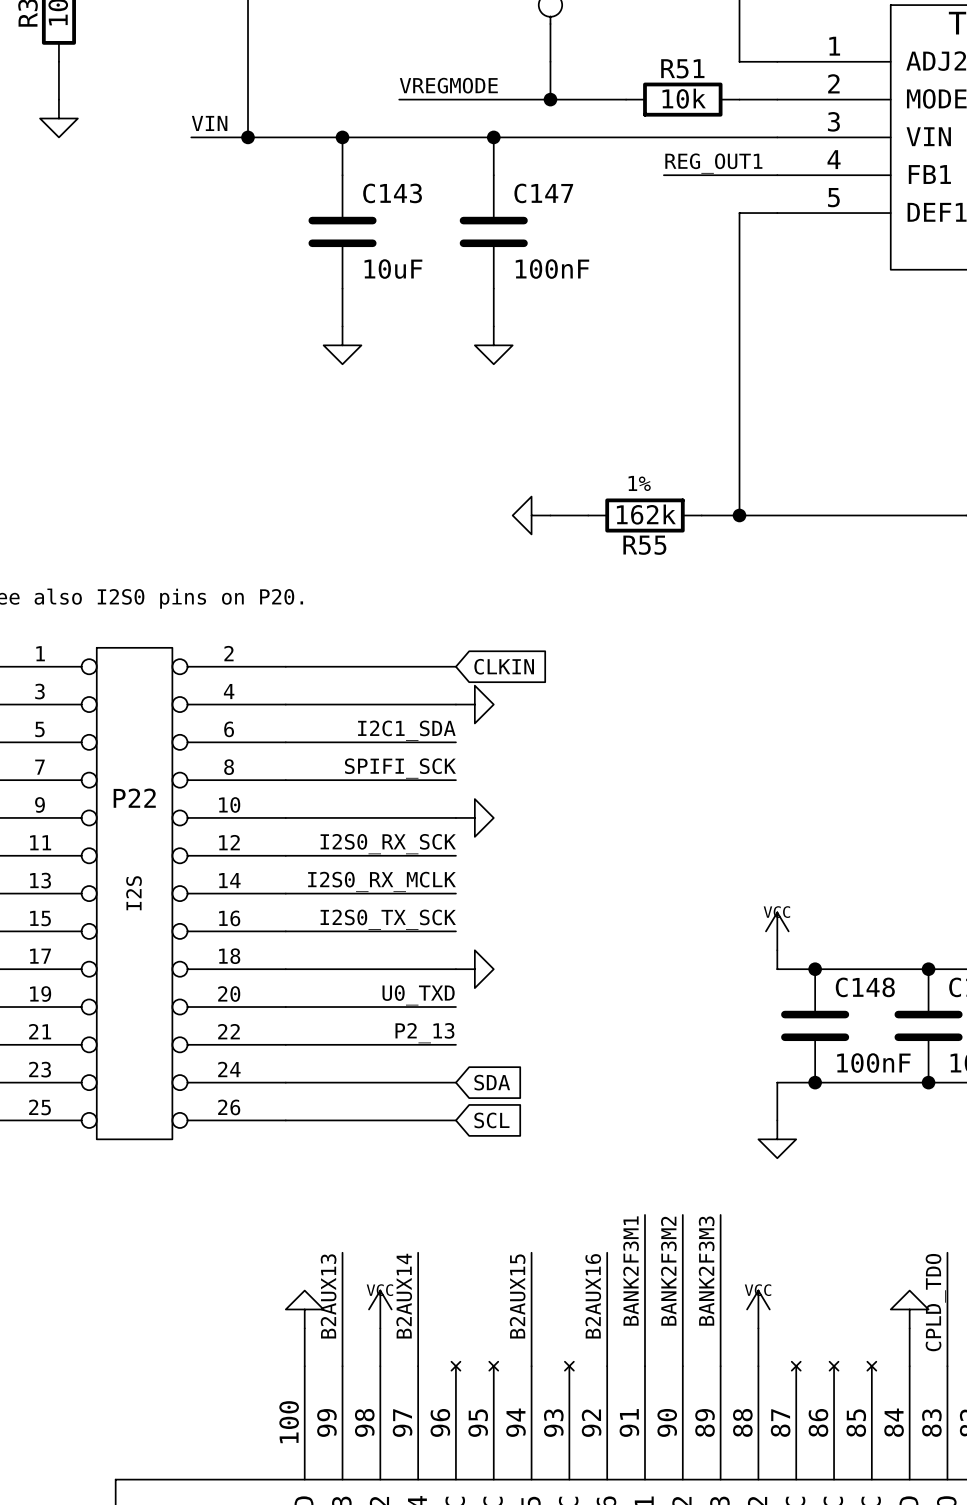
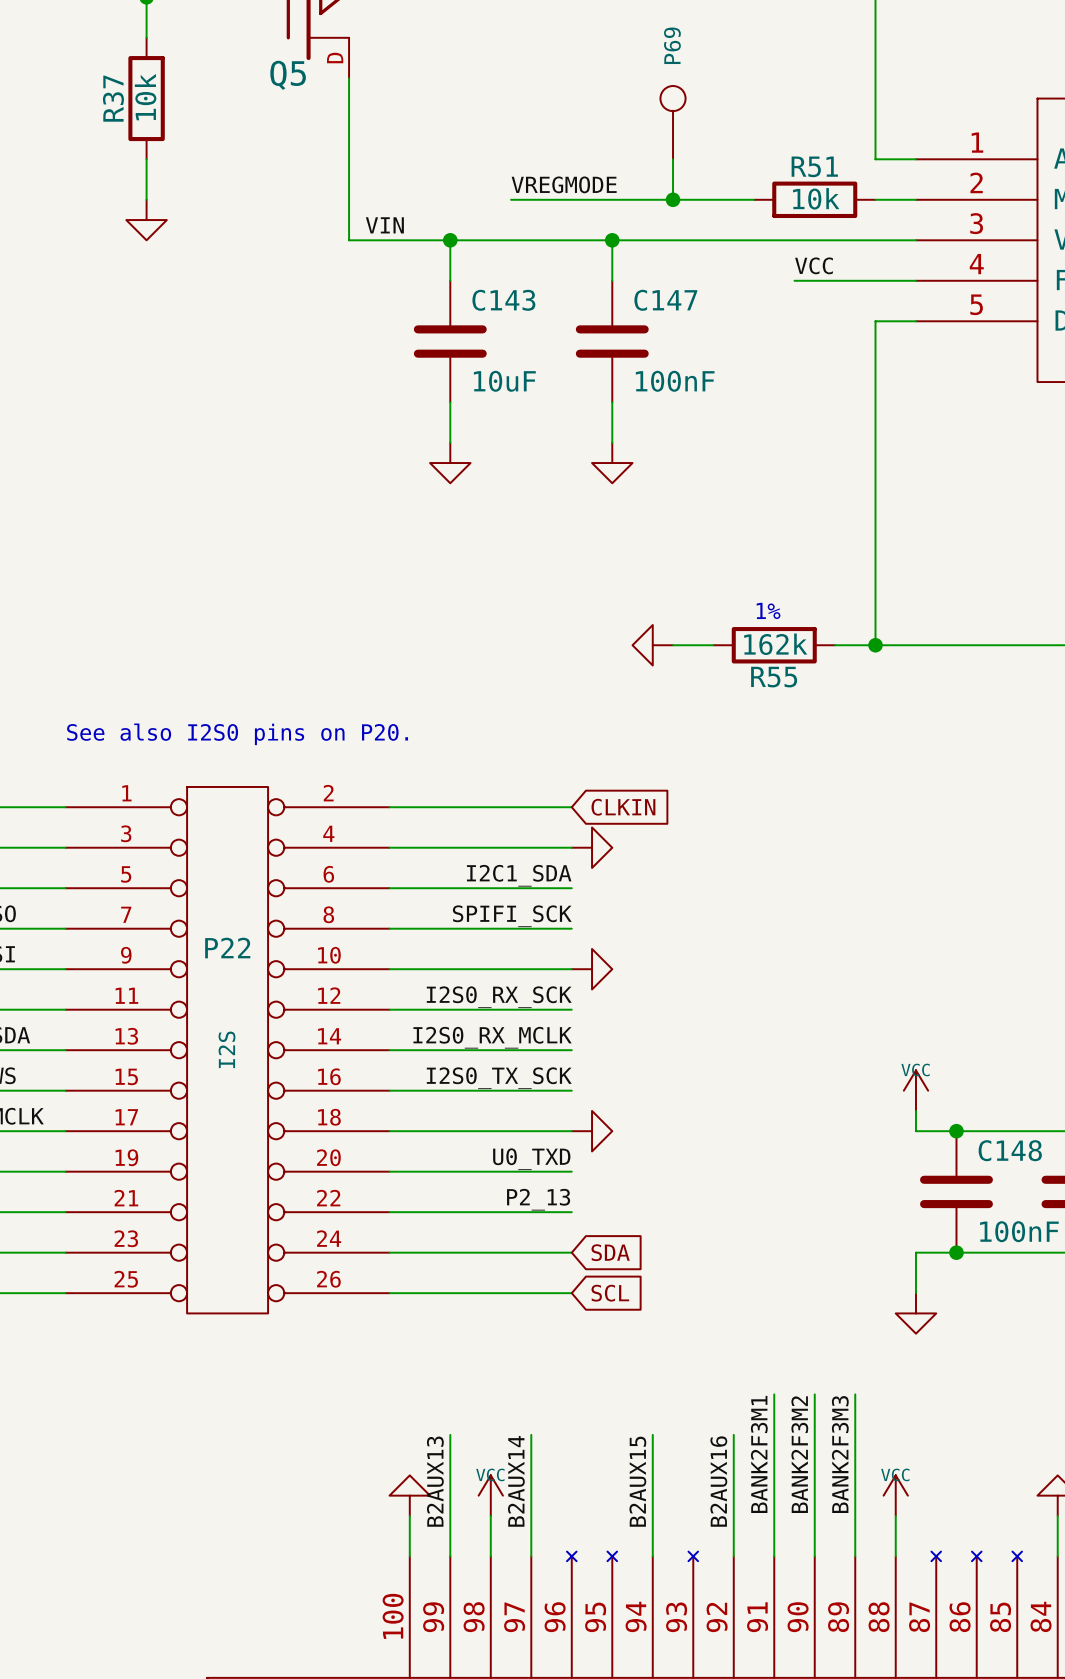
label position: VIN (209, 123) -> VIN (384, 225)
wire: (191, 137) (248, 137) -> none
junction: (248, 137) -> none
label: REG_OUT1 (713, 163) -> VCC (814, 265)

